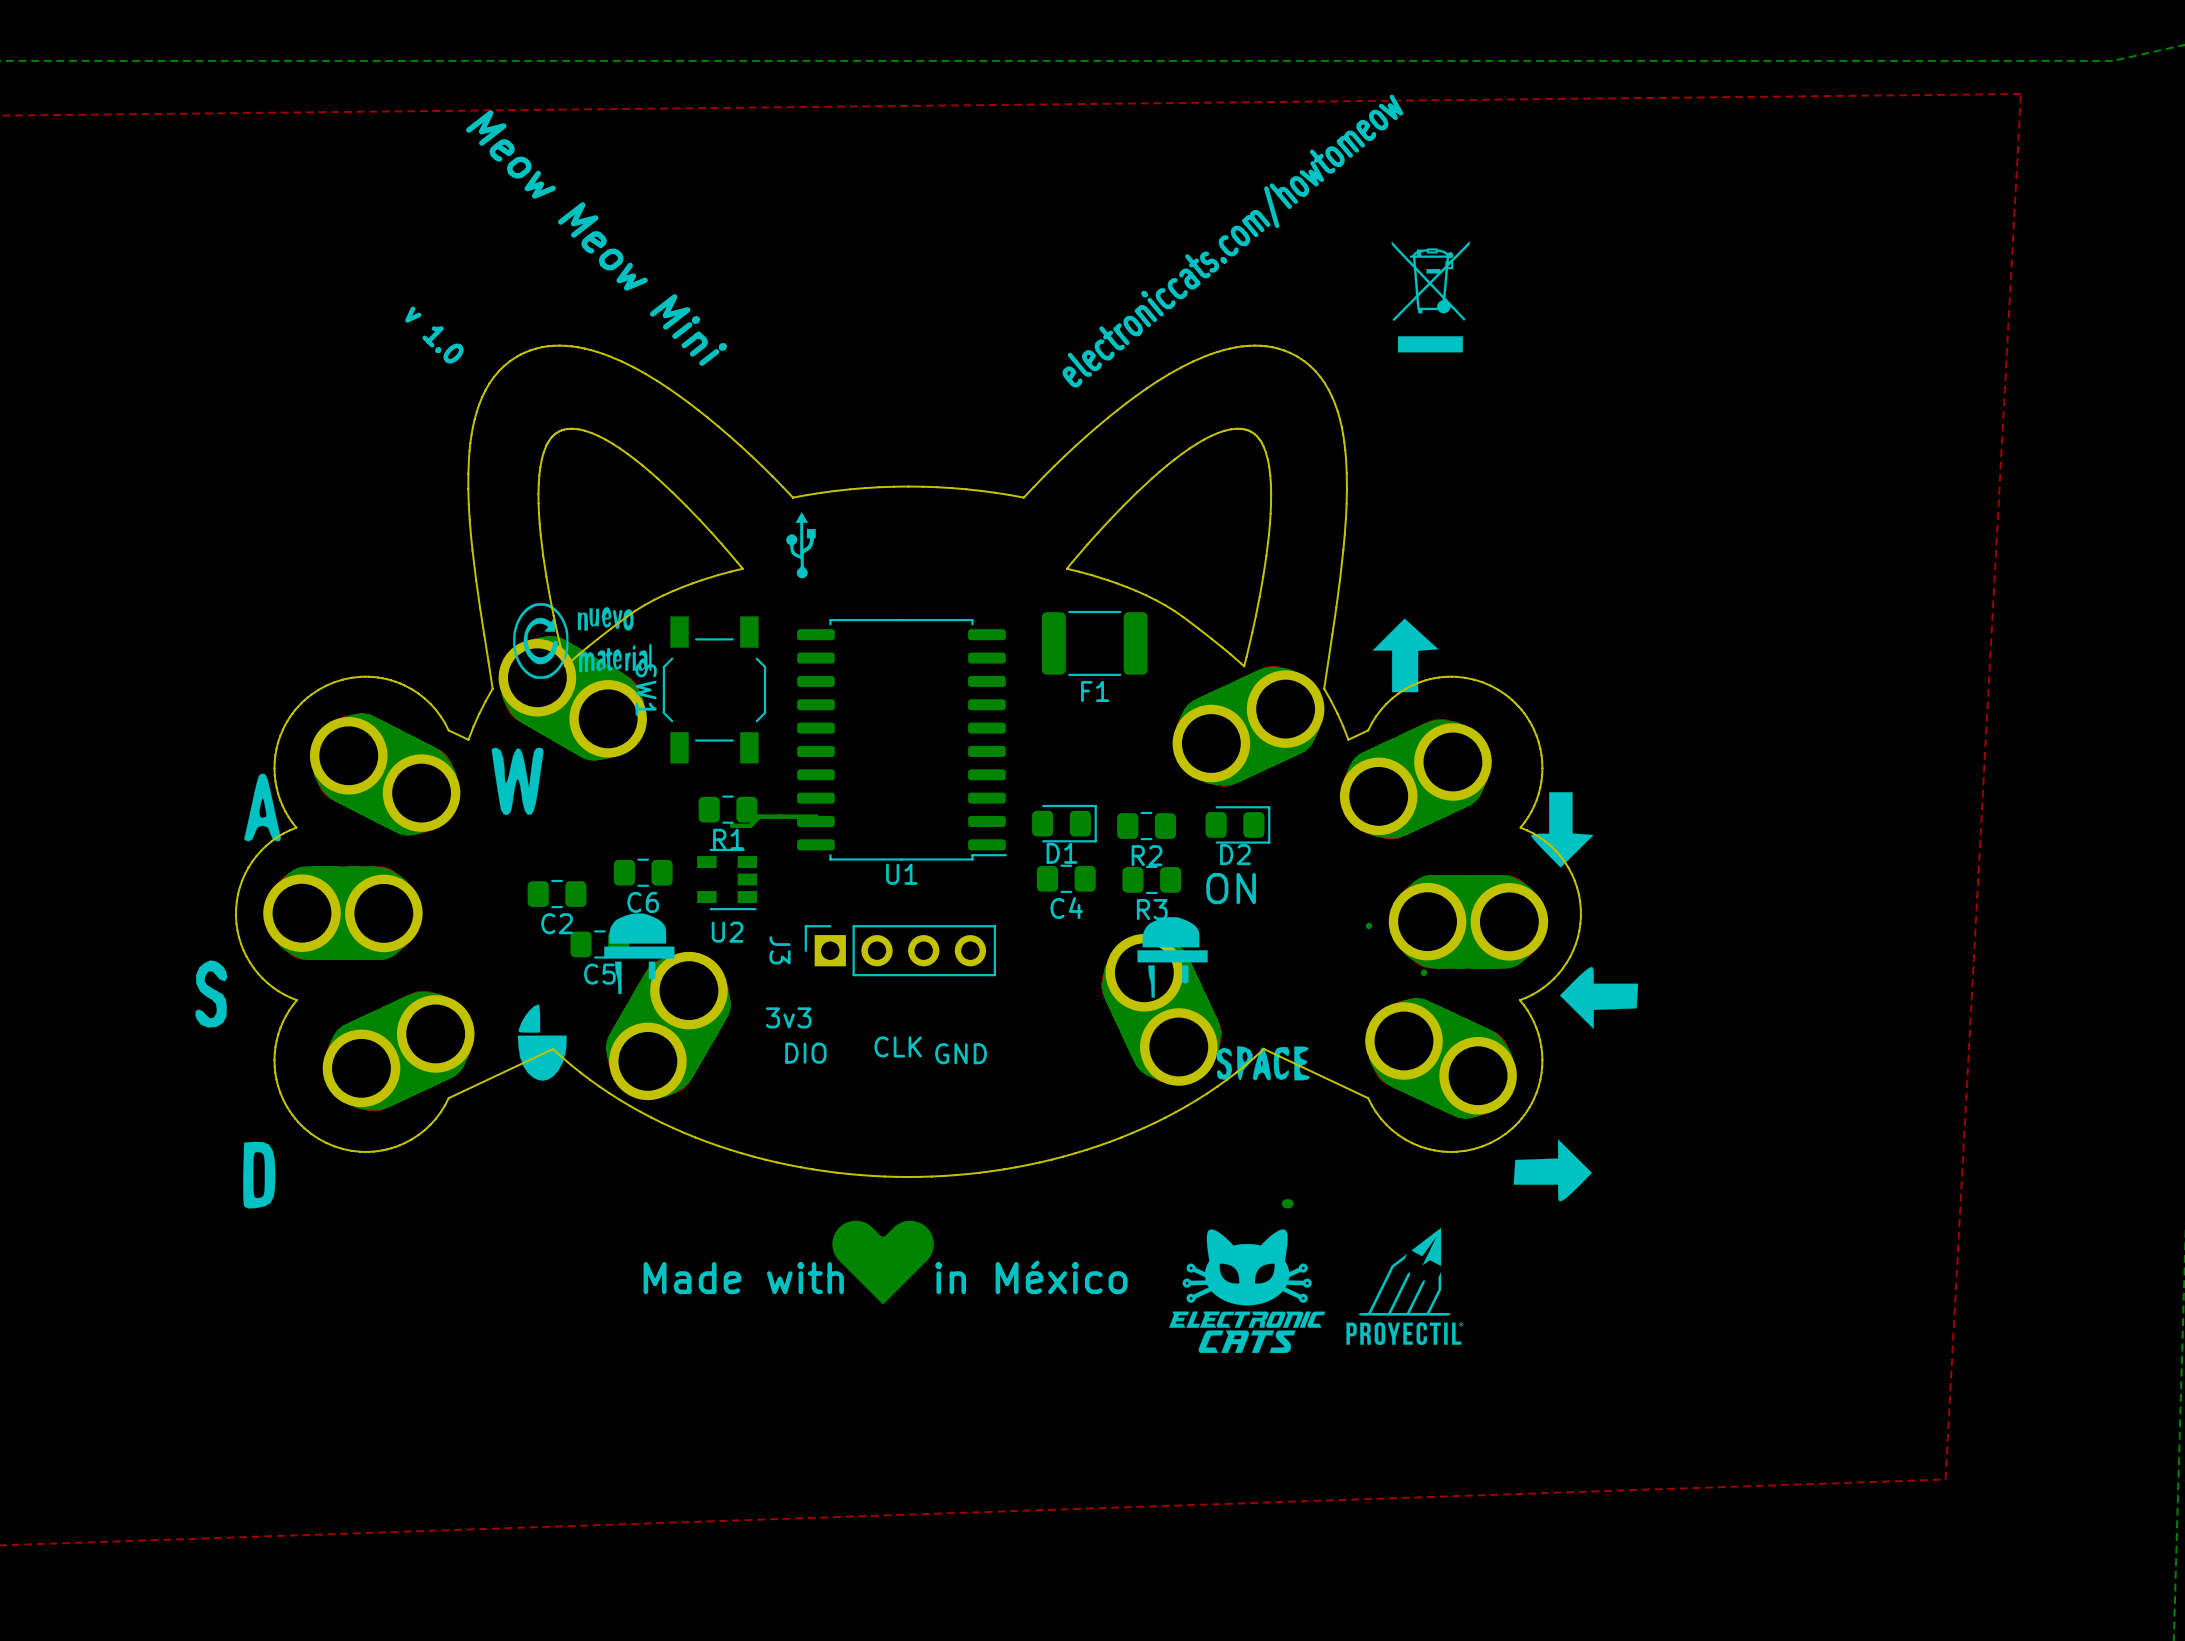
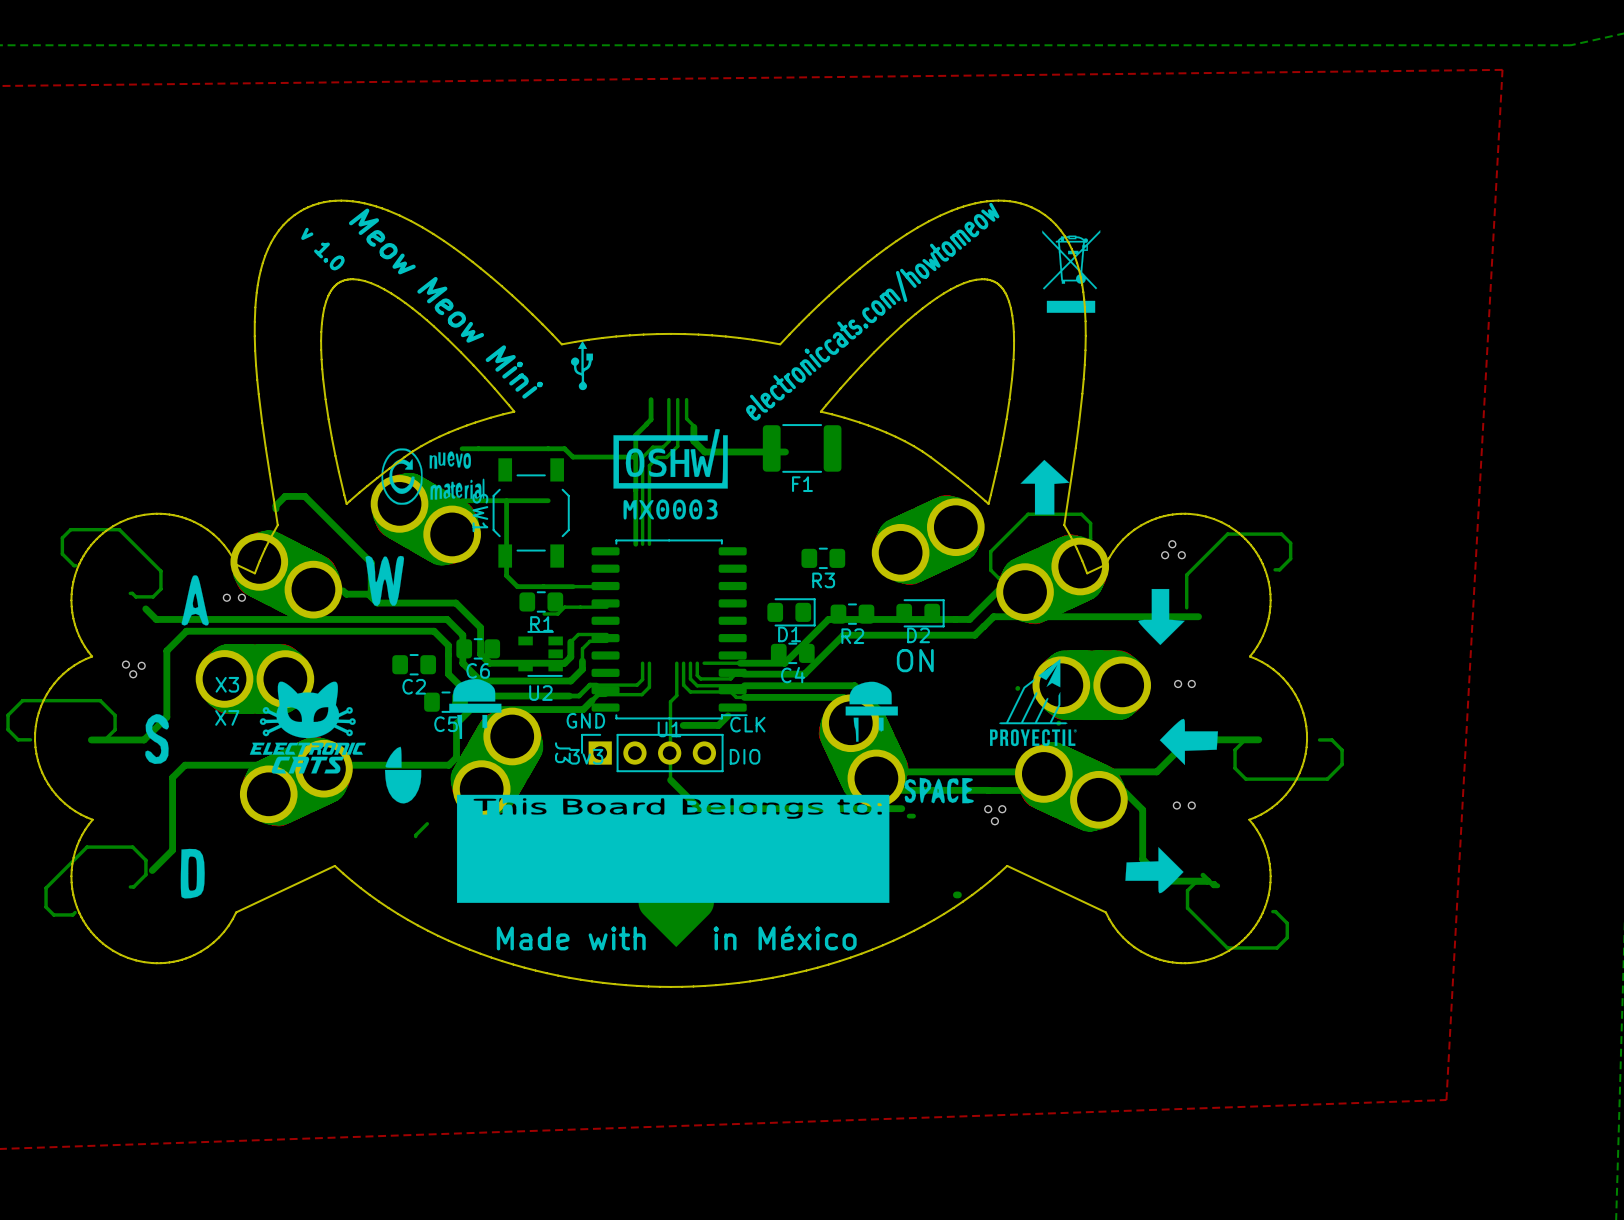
text position: Meow Meow Mini (596, 238) -> Meow Meow Mini (445, 303)
text position: electroniccats.com/howtomeow (1232, 241) -> electroniccats.com/howtomeow (872, 311)
drawing: none -> [34, 199, 1308, 988]
drawing position: (1430, 296) -> (1071, 271)
drawing: [235, 344, 1582, 1178] -> none
bottom track: none -> (651, 399) (651, 419) (646, 423)
bottom track: none -> (668, 399) (668, 441) (663, 447) (652, 447) (642, 457) (642, 544)
bottom track: none -> (677, 399) (677, 446) (666, 457) (657, 457) (649, 465) (649, 544)
bottom track: none -> (686, 399) (686, 418) (693, 426) (693, 430)
drawing position: (800, 545) -> (581, 365)
bottom track: none -> (646, 424) (635, 435) (635, 544)
bottom track: none -> (693, 427) (693, 441) (704, 451) (785, 451)
bottom track: none -> (462, 448) (564, 448) (572, 457) (635, 456)
F1 position: (1094, 643) -> (802, 448)
bottom track: none -> (506, 500) (506, 575) (517, 586) (607, 586)
bottom track: none -> (548, 500) (462, 500)
bottom track: none -> (275, 508) (275, 505) (285, 496) (304, 496) (371, 562) (371, 596)
via: none -> (1172, 544)
U1 position: (902, 739) -> (669, 629)
bottom track: none -> (1075, 549) (1079, 549) (1090, 538) (1090, 523) (1081, 514) (1028, 514) (990, 551) (990, 570) (998, 577) (1017, 577) (1019, 575)
via: none -> (1165, 555)
via: none -> (1181, 555)
bottom track: none -> (76, 565) (62, 553) (62, 538) (70, 529) (119, 529) (160, 571) (160, 589) (153, 596) (135, 596) (130, 593)
bottom track: none -> (1275, 569) (1279, 569) (1290, 558) (1290, 543) (1281, 534) (1227, 534) (1186, 575) (1186, 607)
bottom track: none -> (1009, 579) (969, 619) (828, 619) (784, 663) (740, 663)
bottom track: none -> (343, 590) (346, 594) (368, 594) (377, 603) (455, 603) (480, 627) (480, 654) (489, 663) (564, 663) (570, 657) (570, 642) (578, 634) (607, 634)
via: none -> (226, 597)
via: none -> (241, 597)
bottom track: none -> (145, 608) (156, 619) (447, 619) (462, 635) (462, 663) (480, 680) (570, 680) (582, 669) (582, 661)
bottom track: none -> (1198, 616) (993, 616) (983, 626)
bottom track: none -> (983, 626) (974, 635) (843, 635) (804, 674) (735, 674) (730, 678) (700, 678) (697, 675) (697, 663)
bottom track: none -> (607, 641) (589, 641) (582, 648) (582, 663)
R3 position: (1151, 879) -> (823, 558)
bottom track: none -> (642, 663) (642, 679) (637, 685) (589, 685) (579, 696) (470, 696) (448, 674) (448, 645) (434, 631) (186, 631) (166, 650) (166, 717) (144, 739) (91, 739) (104, 739) (115, 729) (115, 715) (100, 700) (22, 700) (8, 715) (8, 729) (18, 739) (30, 739)
bottom track: none -> (649, 663) (649, 687) (641, 694) (598, 694) (583, 709) (470, 709) (456, 723) (456, 757) (448, 765) (185, 765) (172, 777) (172, 850) (152, 870)
bottom track: none -> (676, 663) (676, 695) (670, 701) (670, 779)
bottom track: none -> (683, 663) (683, 685) (690, 691) (730, 691) (736, 697) (843, 697) (857, 711) (857, 776) (872, 790) (988, 790)
bottom track: none -> (690, 663) (690, 678) (697, 685) (854, 685) (874, 705) (874, 760) (885, 771) (1156, 771) (1188, 739) (1258, 739)
bottom track: none -> (743, 663) (704, 663)
via: none -> (125, 664)
via: none -> (141, 665)
via: none -> (133, 674)
via: none -> (1178, 683)
via: none -> (1191, 683)
text: none -> X3 (227, 684)
J3 position: (900, 950) -> (652, 753)
bottom track: none -> (728, 715) (718, 725) (683, 725)
text: none -> X7 (227, 717)
bottom track: none -> (1258, 739) (1245, 739) (1235, 750) (1235, 768) (1245, 779) (1327, 779) (1342, 764) (1342, 750) (1331, 739) (1319, 739)
text position: CLK (898, 1046) -> CLK (747, 724)
bottom track: none -> (670, 780) (699, 808) (901, 808)
text position: DIO (805, 1053) -> DIO (745, 756)
text position: GND (961, 1053) -> GND (585, 720)
bottom track: none -> (988, 790) (1123, 790) (1142, 809) (1142, 859) (1164, 881) (1207, 881)
via: none -> (1176, 805)
via: none -> (1191, 805)
via: none -> (988, 809)
via: none -> (1002, 809)
bottom track: none -> (913, 816) (909, 816)
via: none -> (994, 821)
bottom track: none -> (427, 823) (415, 836)
bottom track: none -> (1202, 875) (1213, 885) (1217, 885) (1214, 882) (1195, 882) (1187, 890) (1187, 908) (1227, 947) (1277, 947) (1287, 937) (1287, 923) (1275, 911) (1272, 911)
bottom track: none -> (130, 886) (133, 886) (145, 874) (145, 860) (132, 847) (87, 847) (46, 888) (46, 907) (53, 914) (72, 914) (75, 912)
drawing: [1169, 1229, 1326, 1353] -> none
drawing position: (883, 1262) -> (676, 915)
text position: Made with in México (885, 1277) -> Made with in México (676, 937)
drawing position: (1404, 1286) -> (1033, 702)

